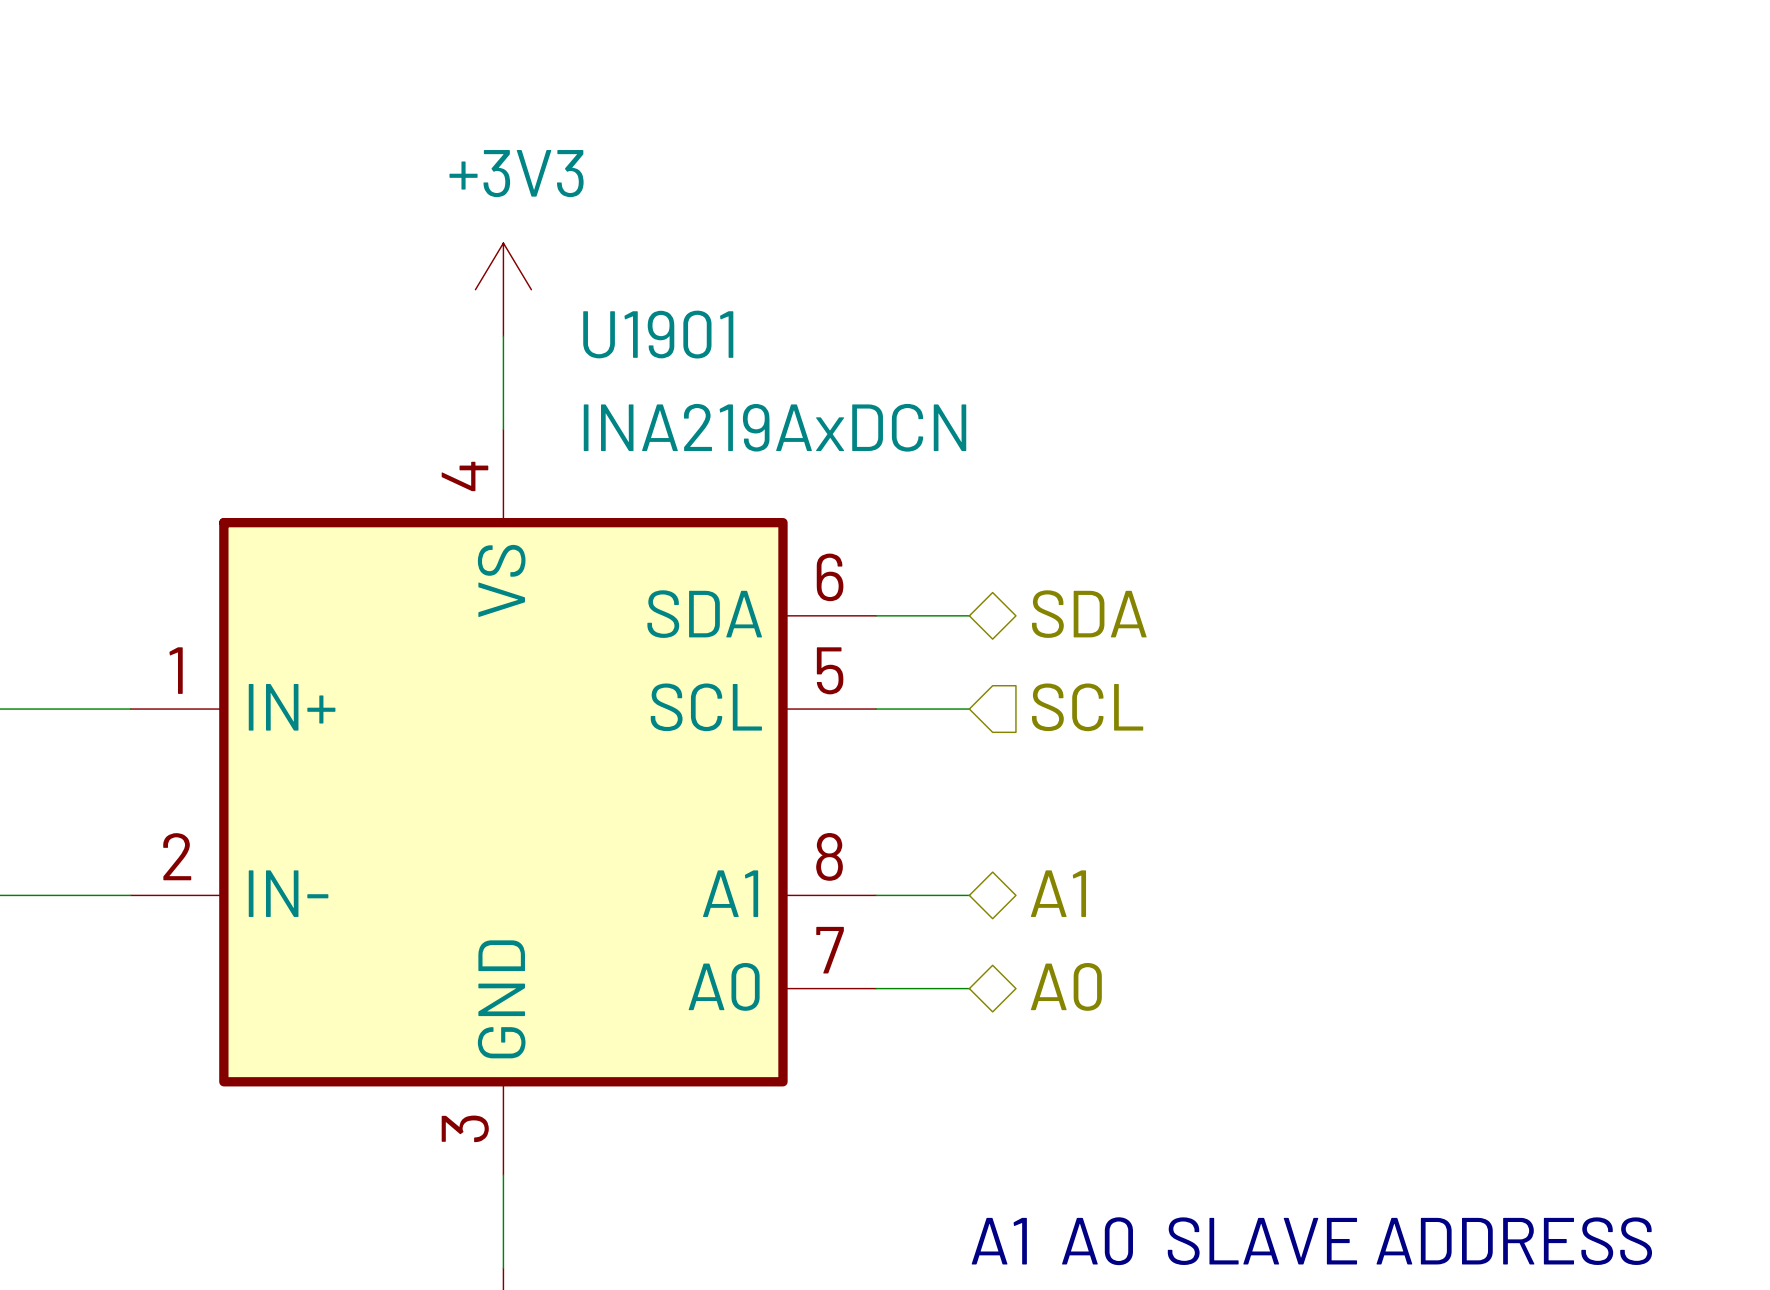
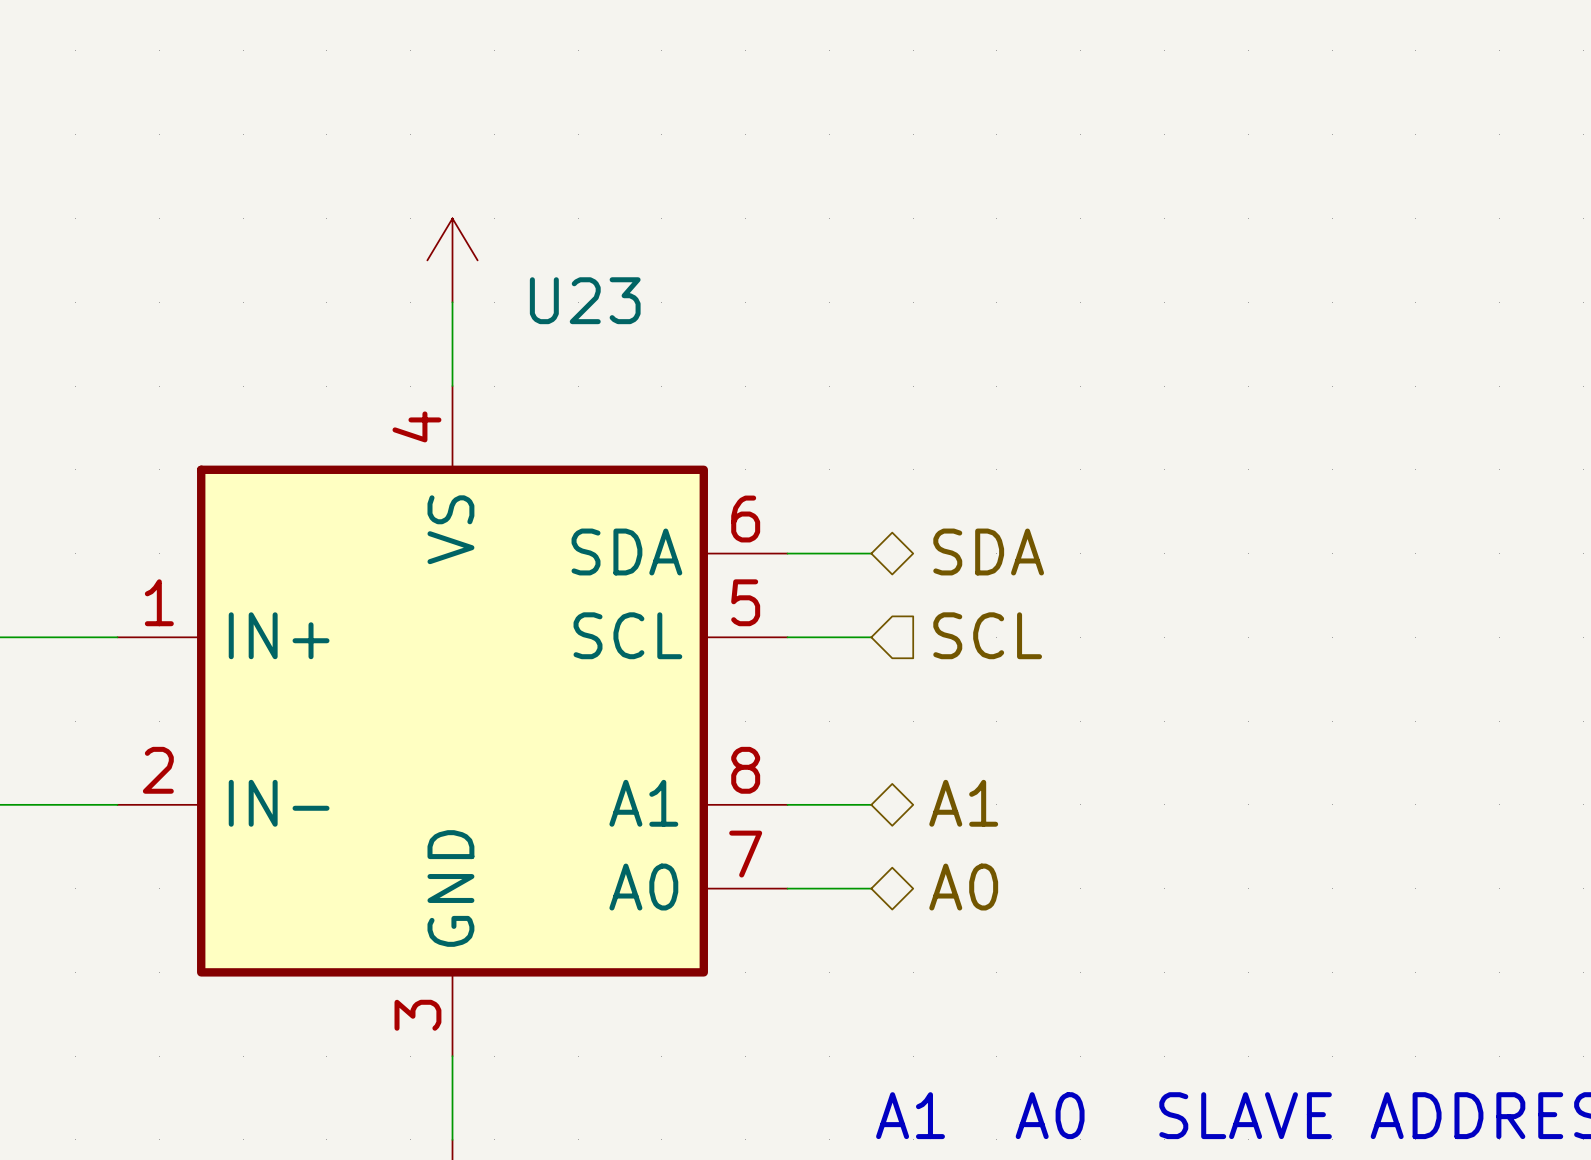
power symbol text: +3V3 (516, 173) -> none
U1901 name: U1901 (658, 334) -> U23 (585, 300)
U1901 value: INA219AxDCN (775, 427) -> none

